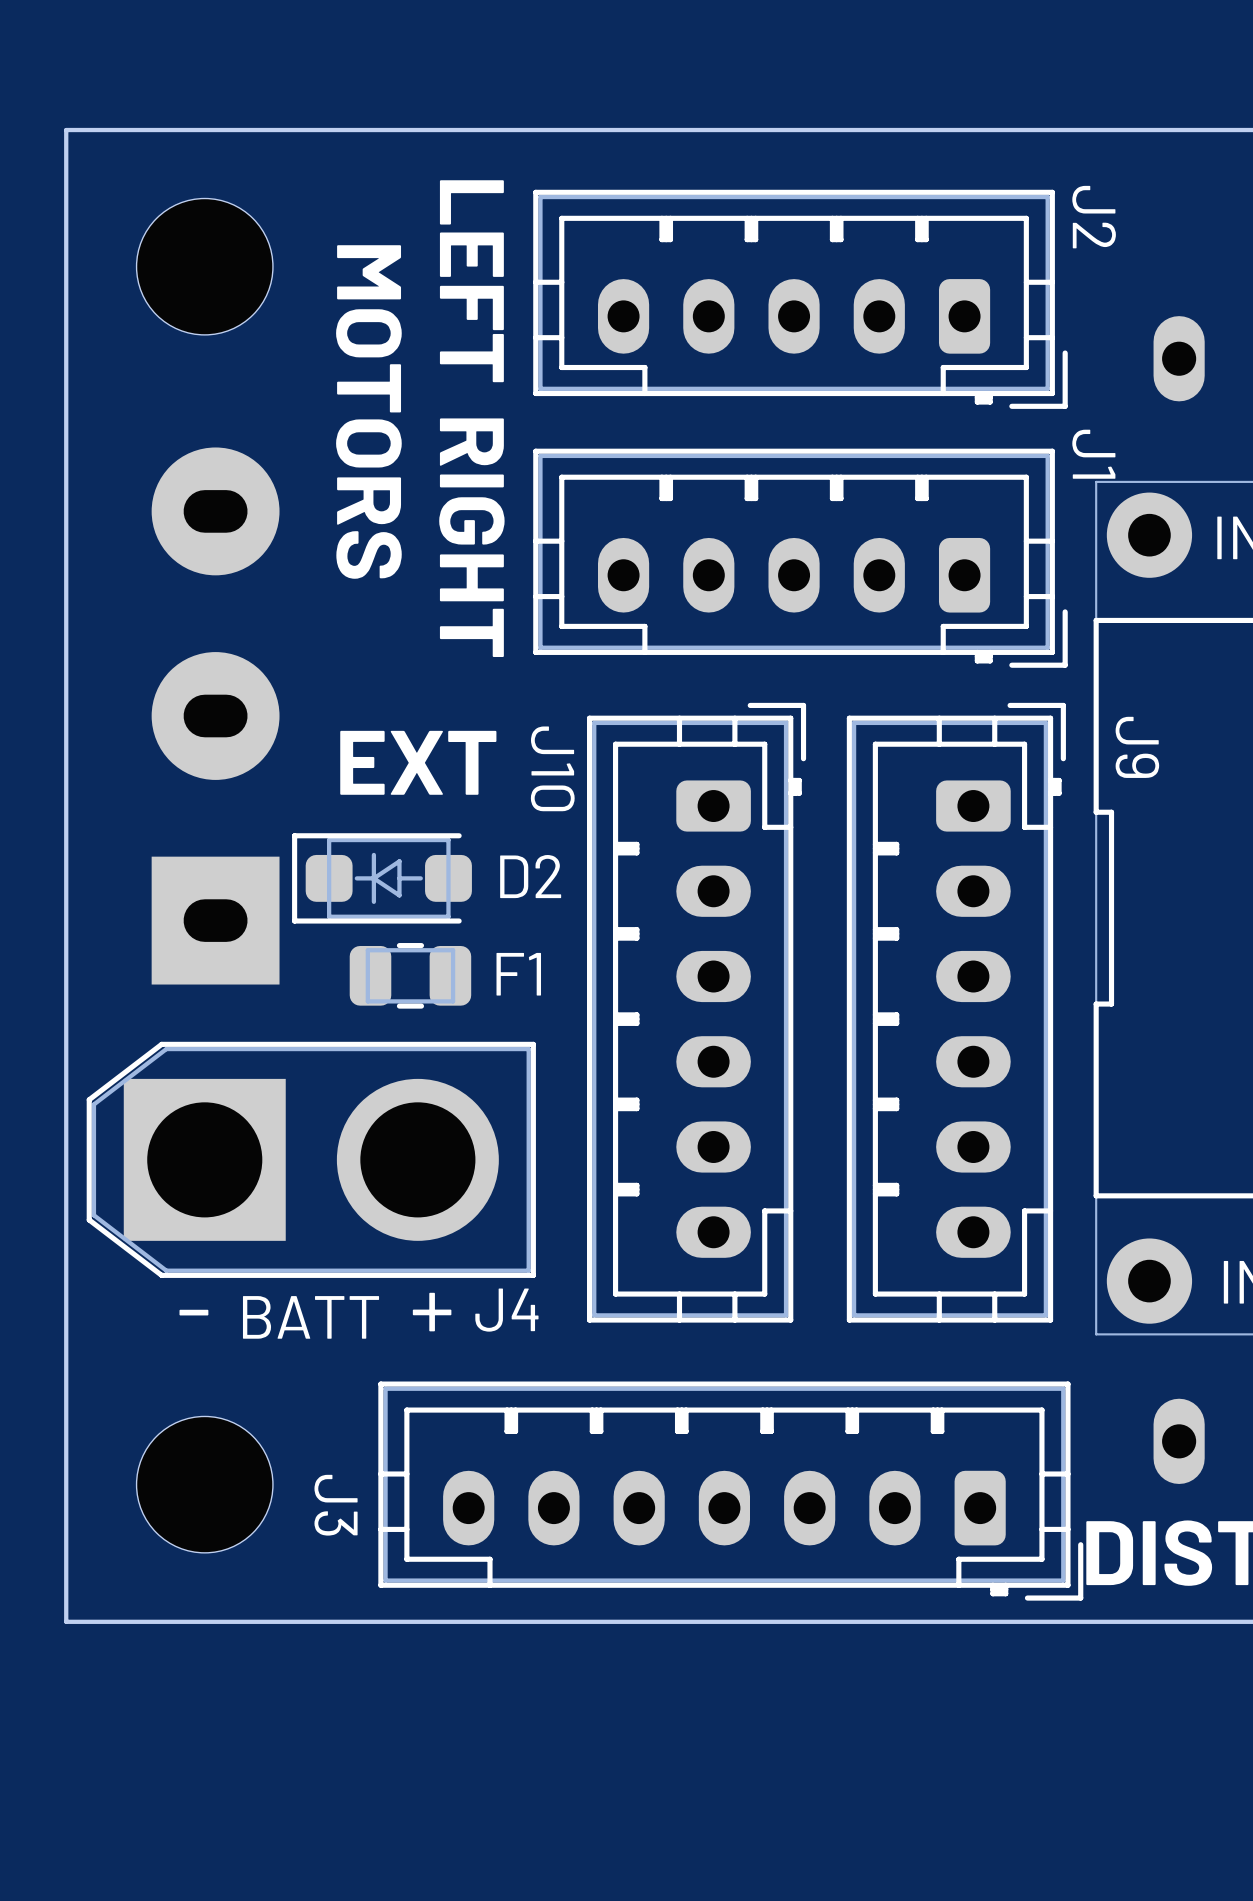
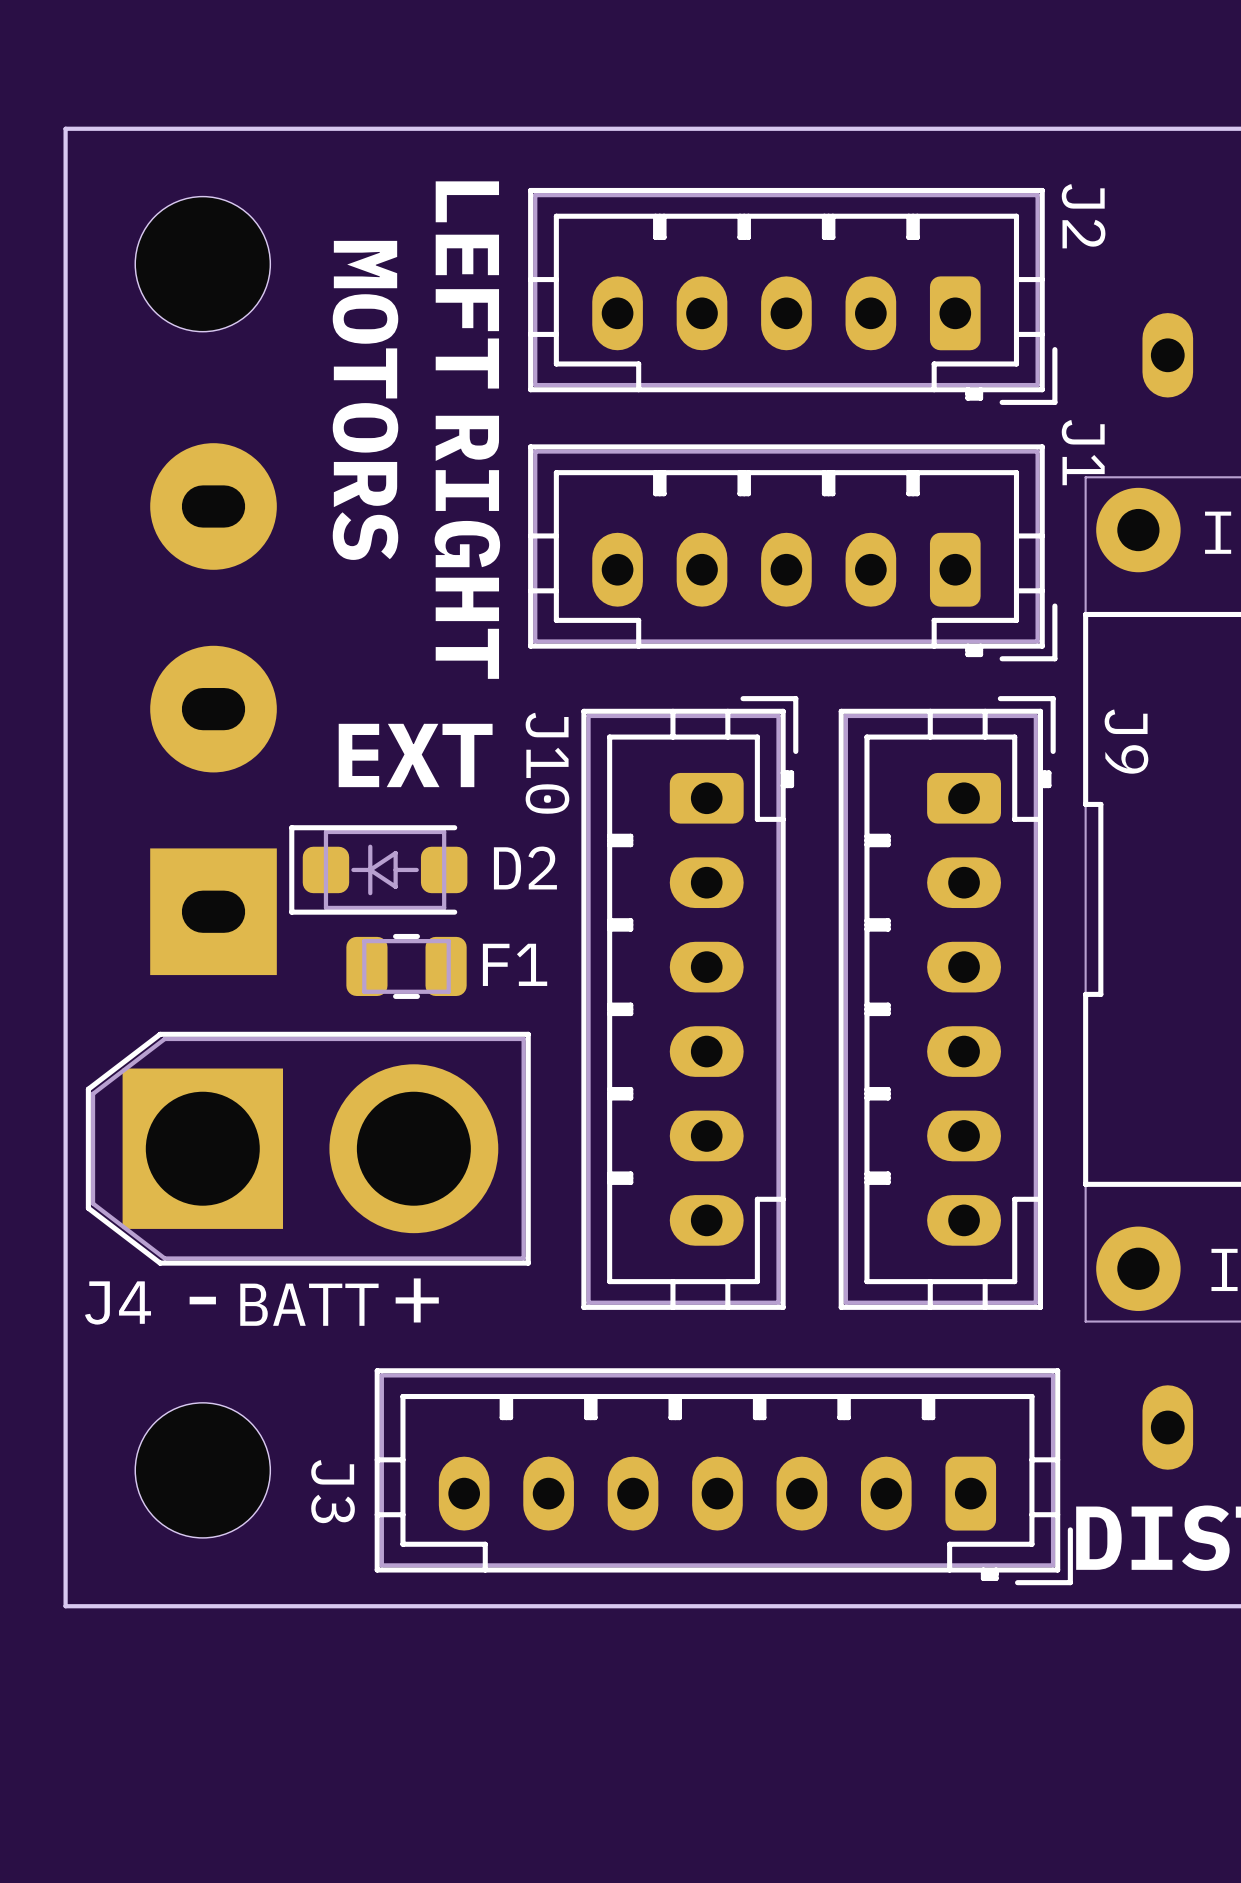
J4 footprint: [86, 1041, 536, 1278] -> [85, 1031, 531, 1266]
J4 name position: J4 (506, 1310) -> J4 (118, 1302)

